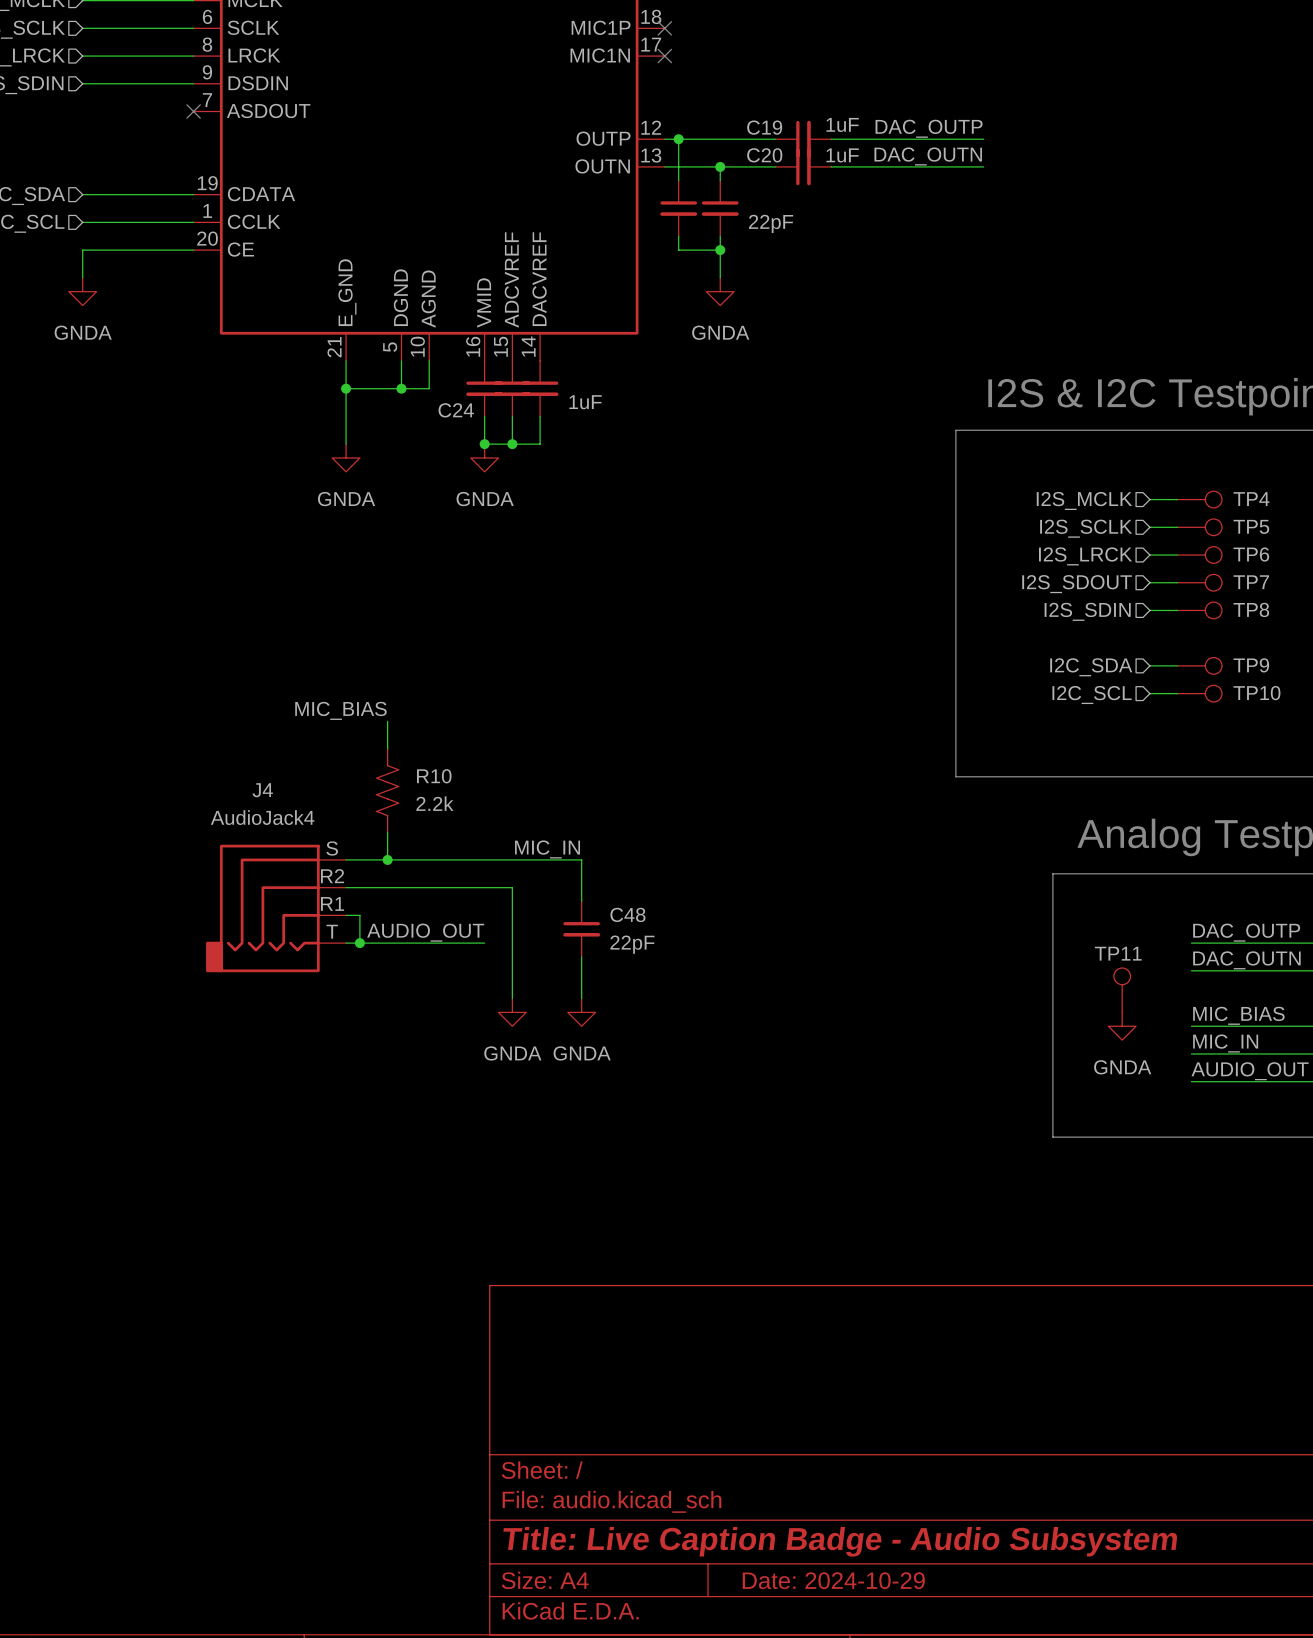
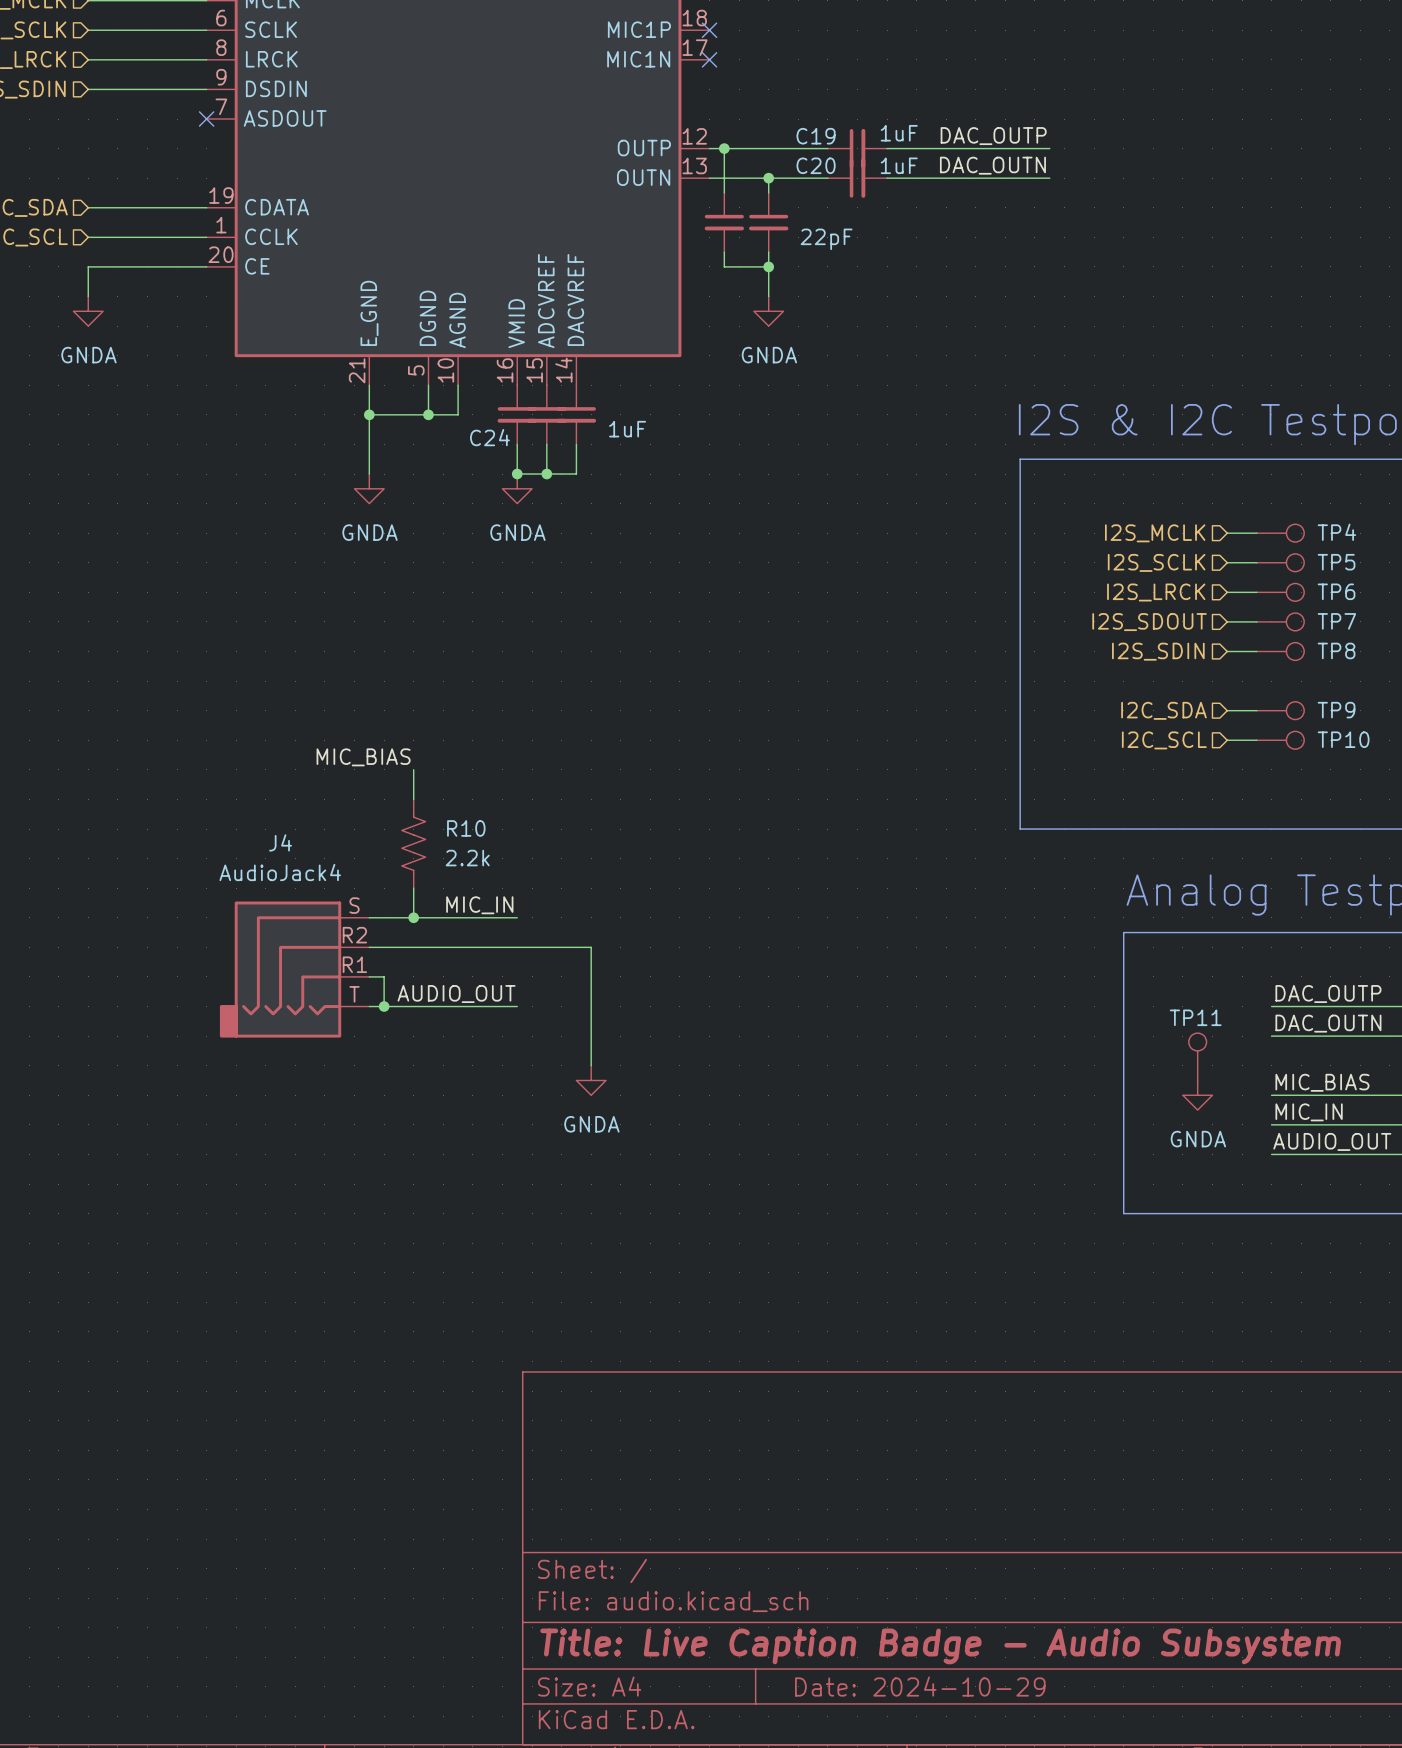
label position: MIC_IN (547, 849) -> MIC_IN (479, 905)
wire: (484, 859) (581, 859) (581, 901) -> none
wire: (512, 887) (512, 998) -> (546, 947) (591, 947) (591, 1065)
C48: 22pF (581, 929) -> none
wire: (581, 956) (581, 998) -> none
power symbol: GNDA (512, 1012) -> none
power symbol: none -> GNDA (591, 1080)
power symbol: GNDA (581, 1012) -> none

